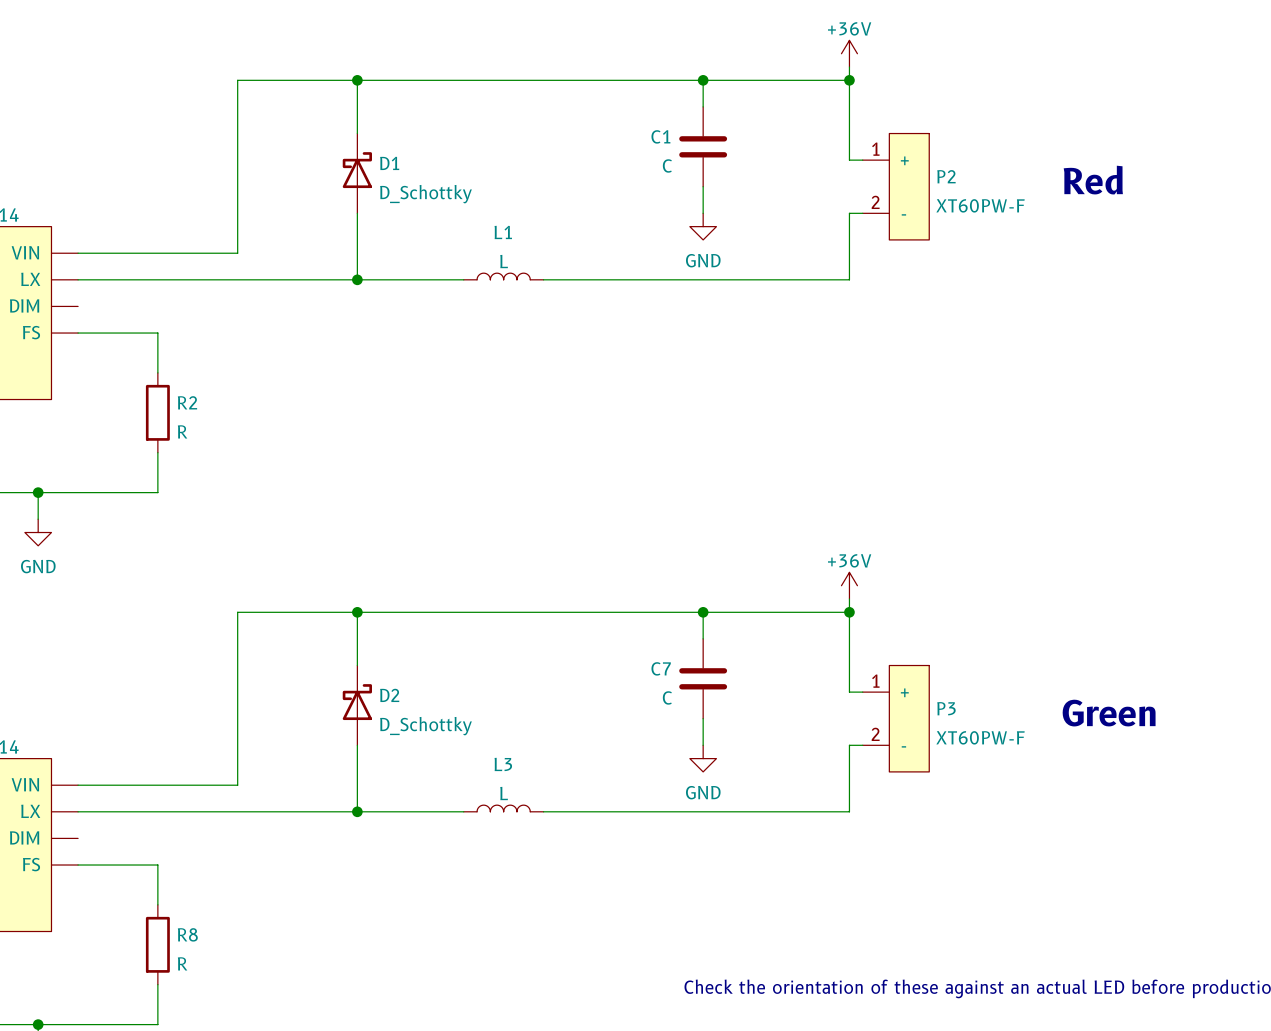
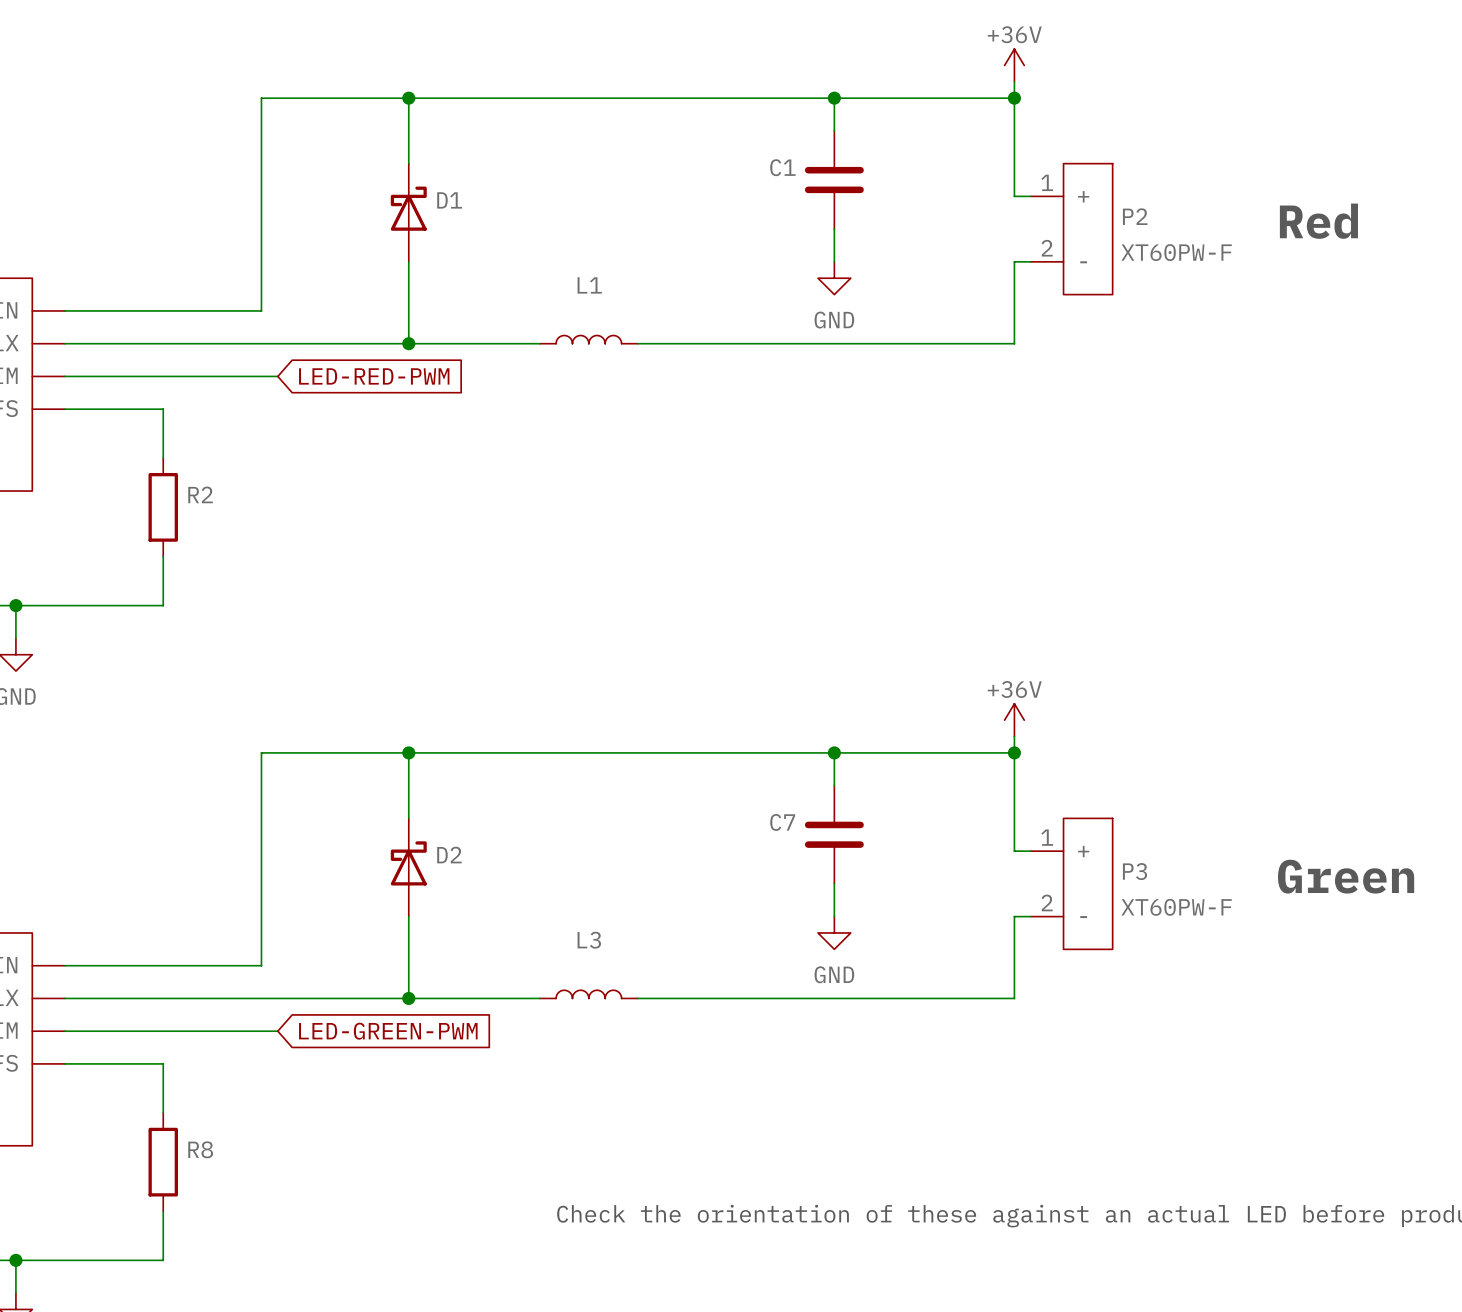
C1 value: C (667, 165) -> none
D1 value: D_Schottky (425, 194) -> none
L1 value: L (504, 261) -> none
wire: none -> (65, 376) (277, 376)
global label: none -> LED-RED-PWM (374, 376)
R2 value: R (182, 431) -> none
C7 value: C (667, 697) -> none
D2 value: D_Schottky (425, 726) -> none
L3 value: L (504, 793) -> none
wire: none -> (65, 1031) (277, 1031)
global label: none -> LED-GREEN-PWM (388, 1031)
R8 value: R (182, 963) -> none

